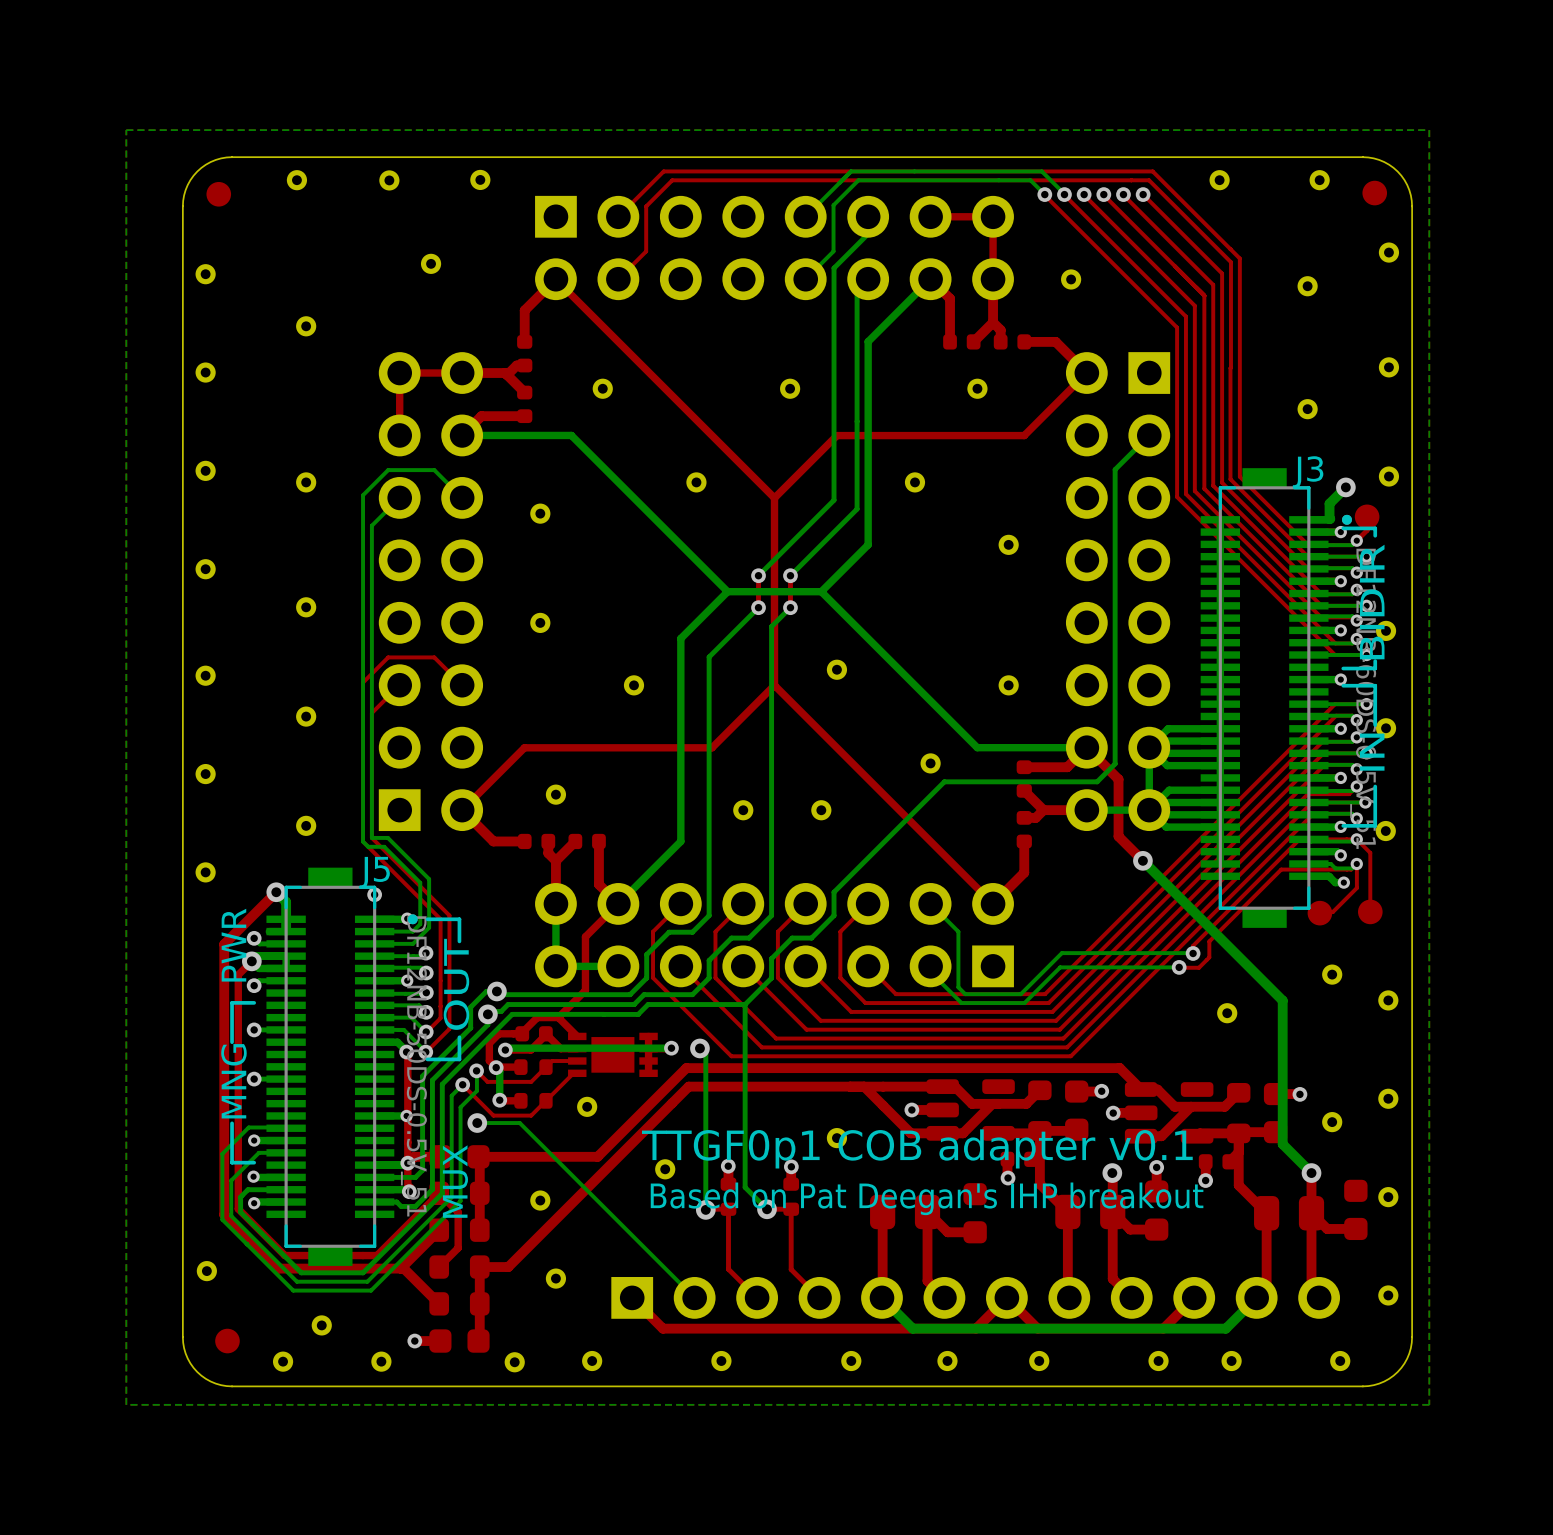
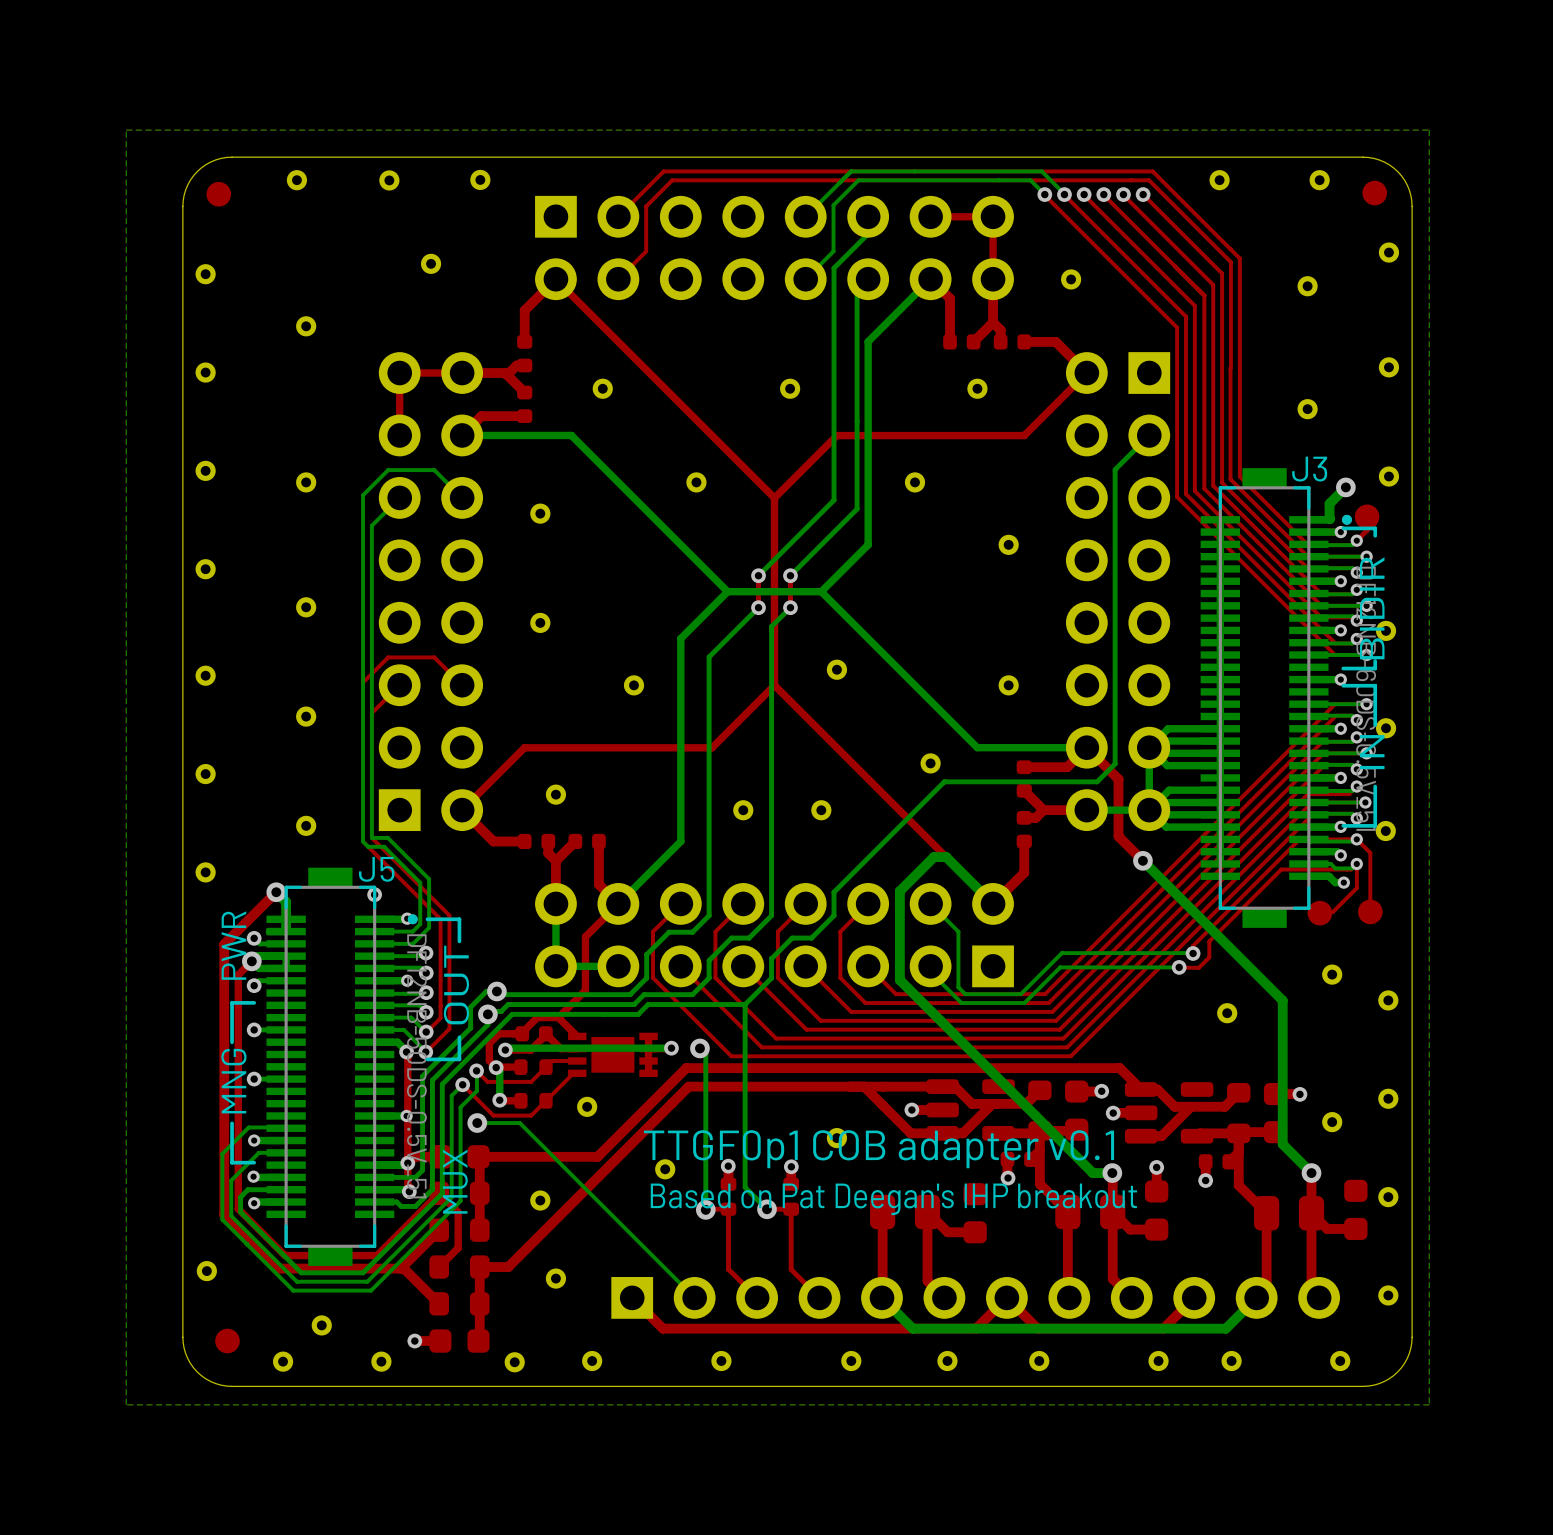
bottom track: none -> (993, 903) (946, 857) (933, 857) (899, 891) (899, 980) (1092, 1173) (1112, 1173)

